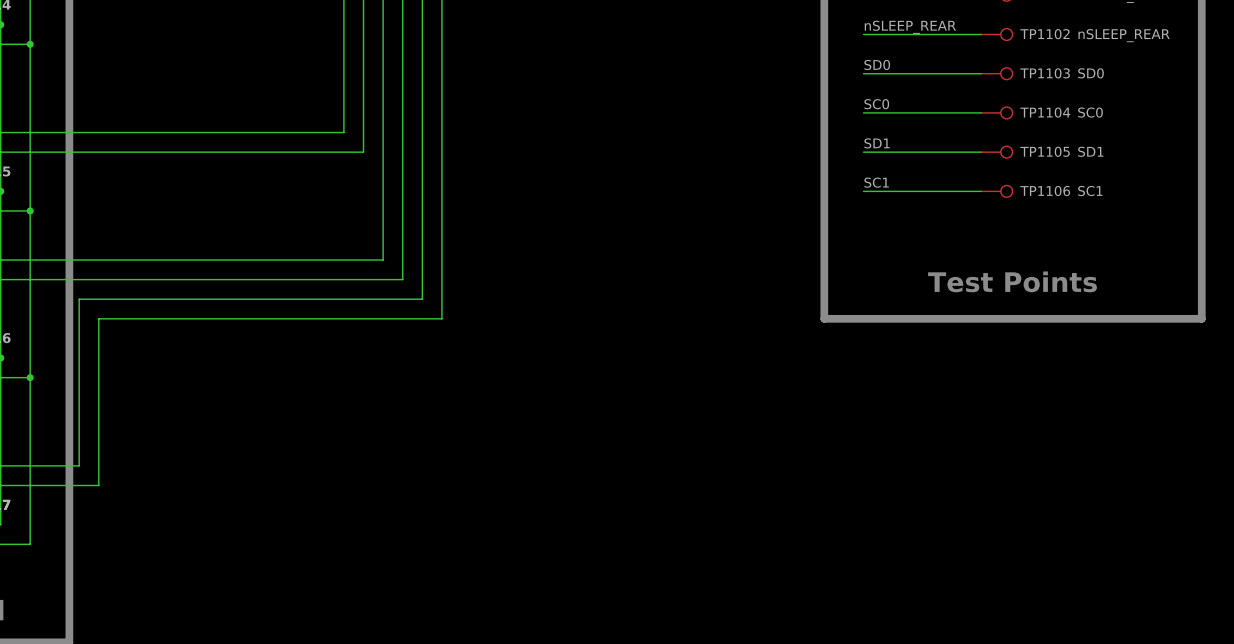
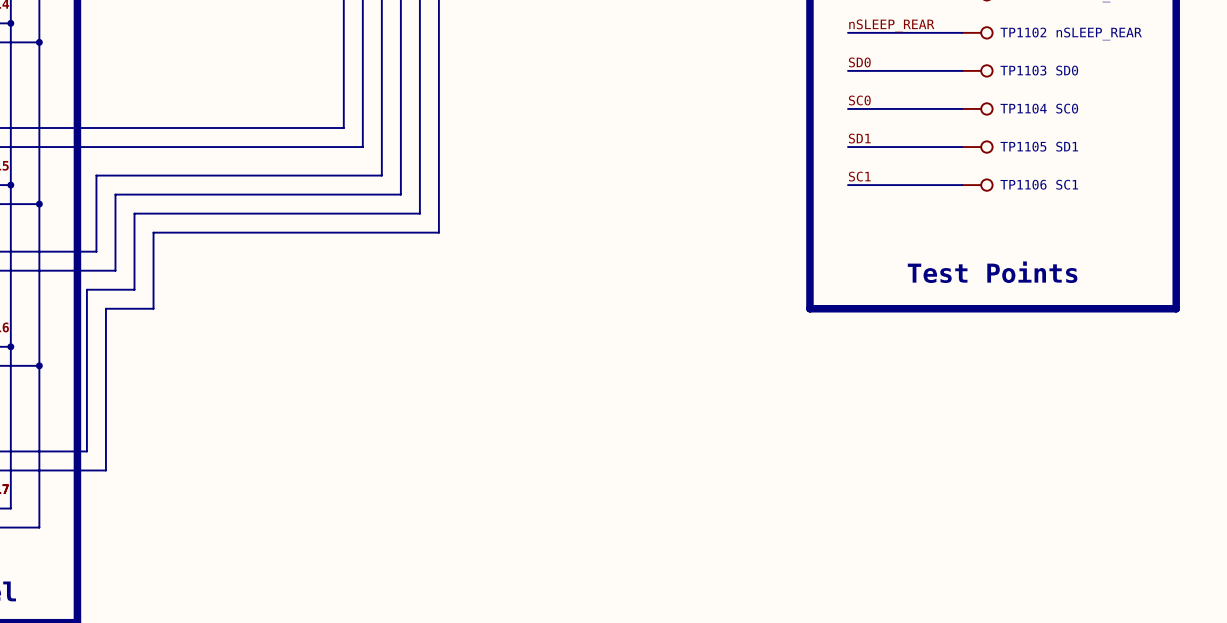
wire: (383, 181) (383, 260) (88, 260) -> (381, 175) (96, 175) (96, 251)
wire: (402, 201) (402, 279) (108, 279) -> (400, 194) (115, 194) (115, 270)
wire: (422, 220) (422, 299) (128, 299) -> (419, 213) (134, 213) (134, 289)
wire: (441, 240) (441, 318) (147, 318) -> (438, 232) (153, 232) (153, 308)

